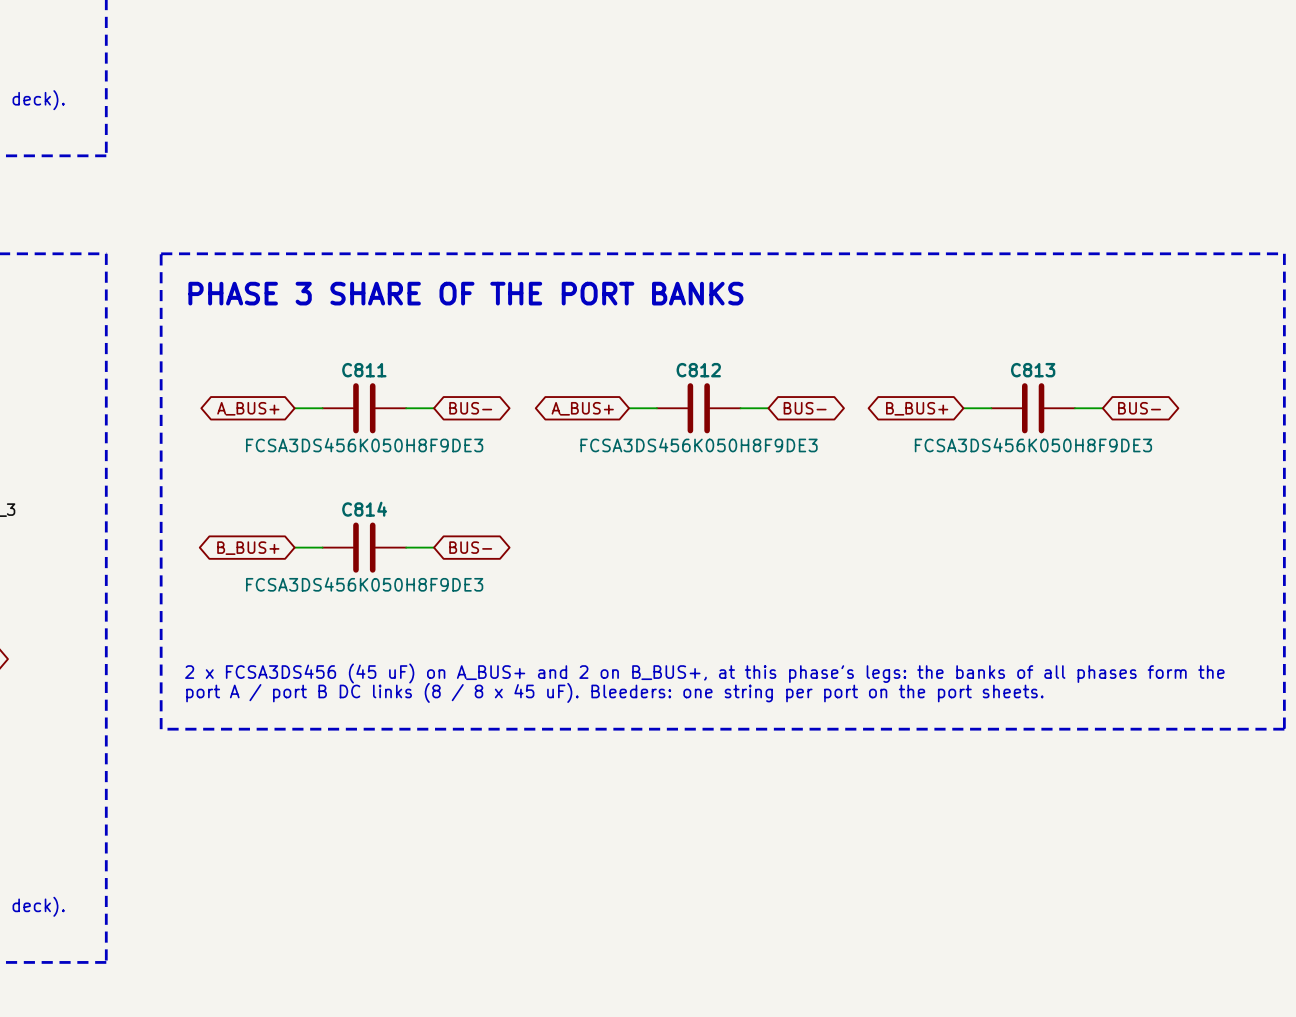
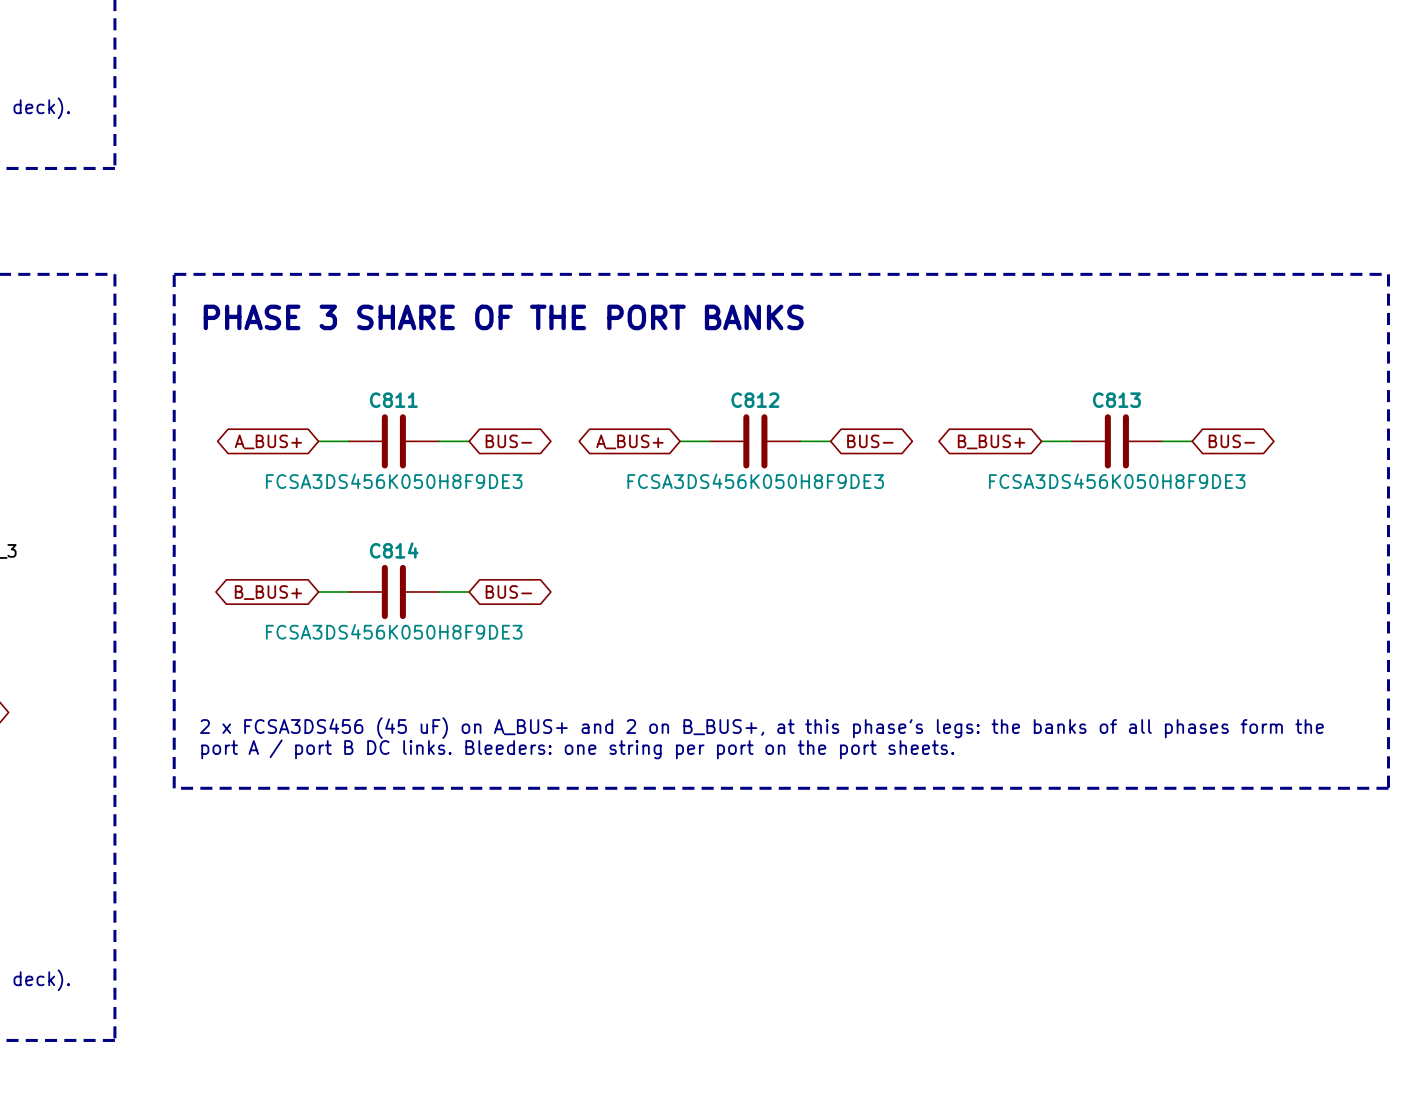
text: port A / port B DC links (8 / 8 x 45 uF). Bleeders: one string per port on the port sheets. (614, 692) -> port A / port B DC links. Bleeders: one string per port on the port sheets. (577, 749)

